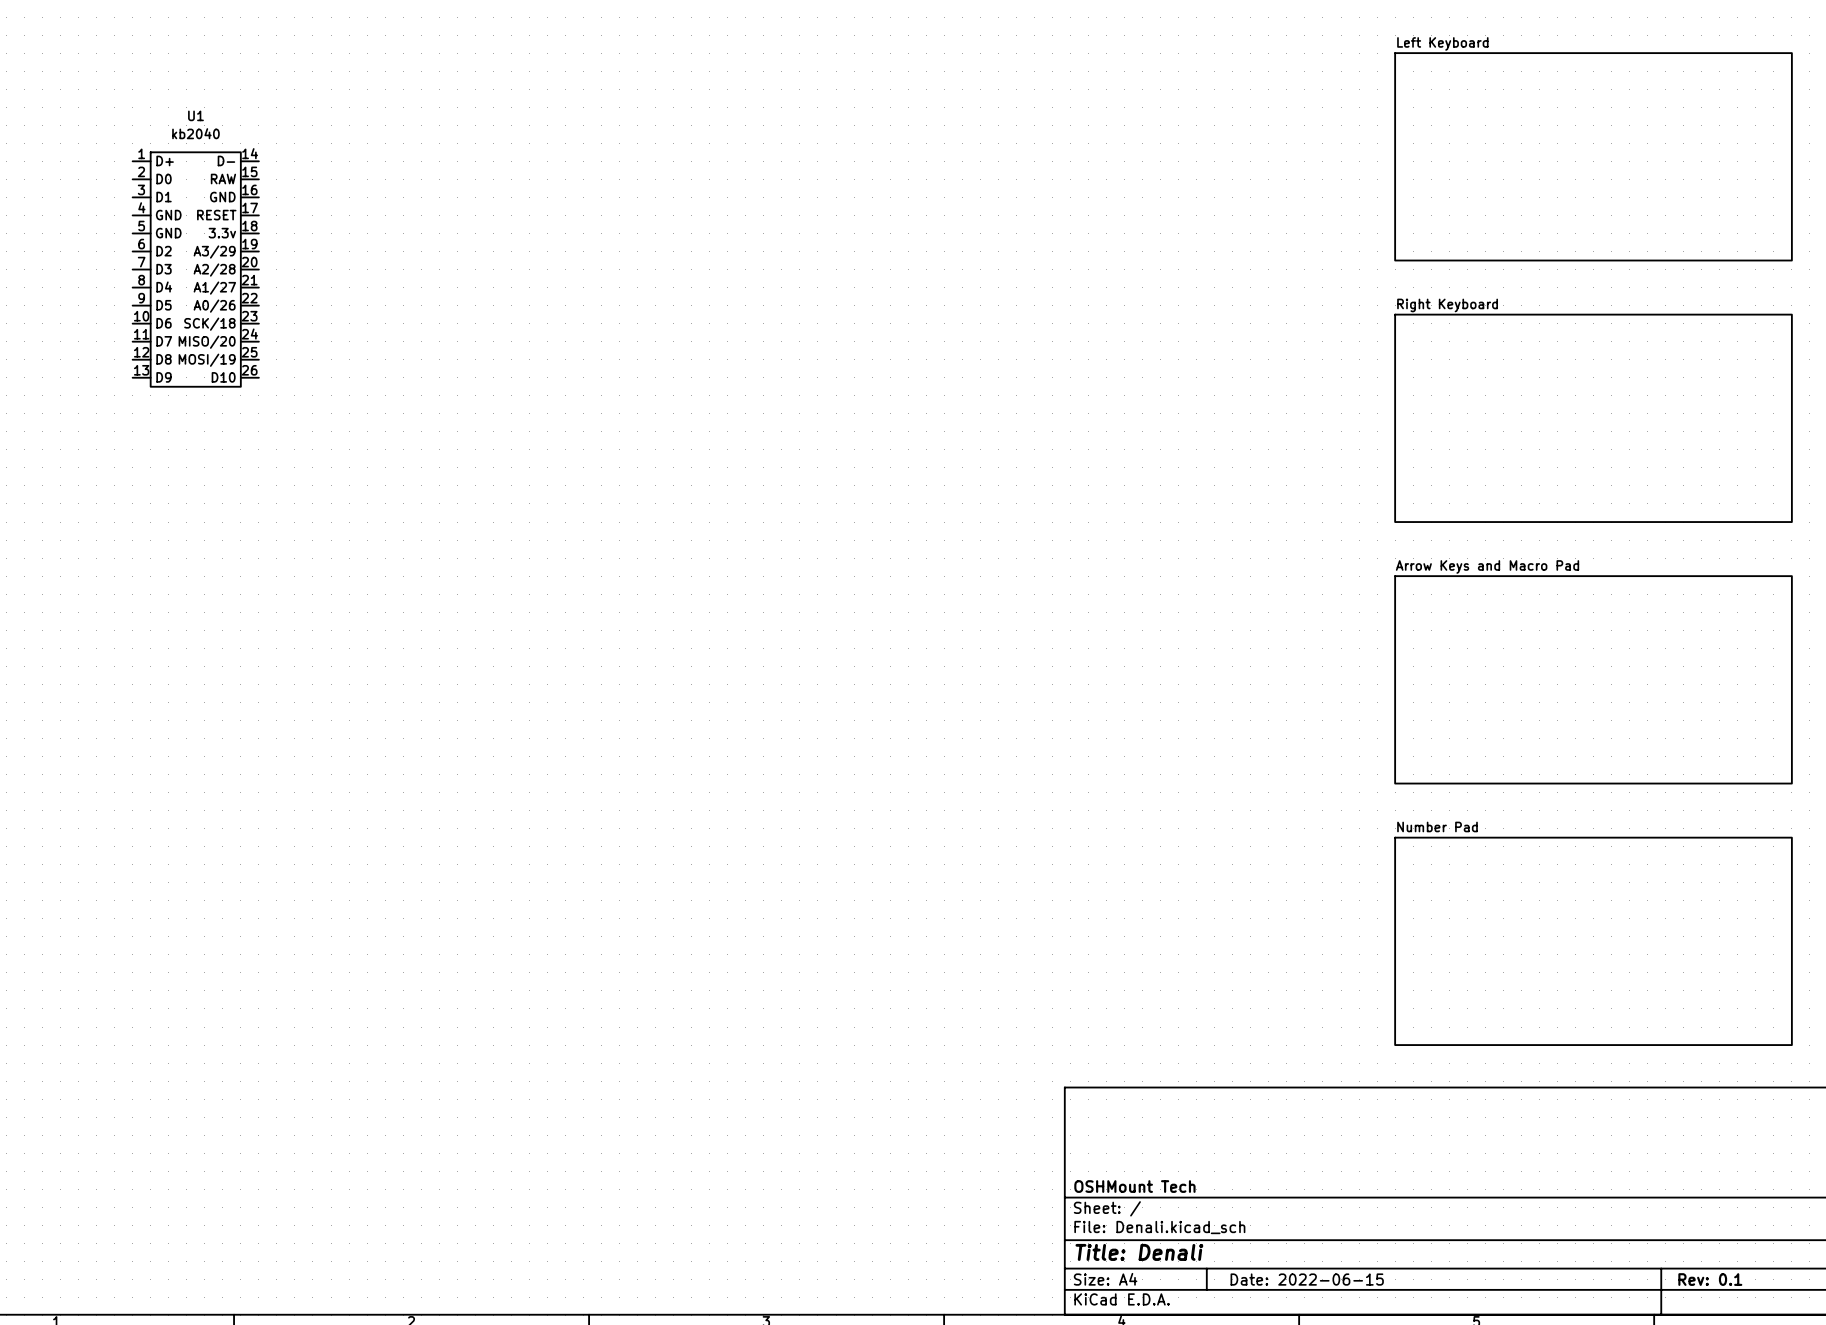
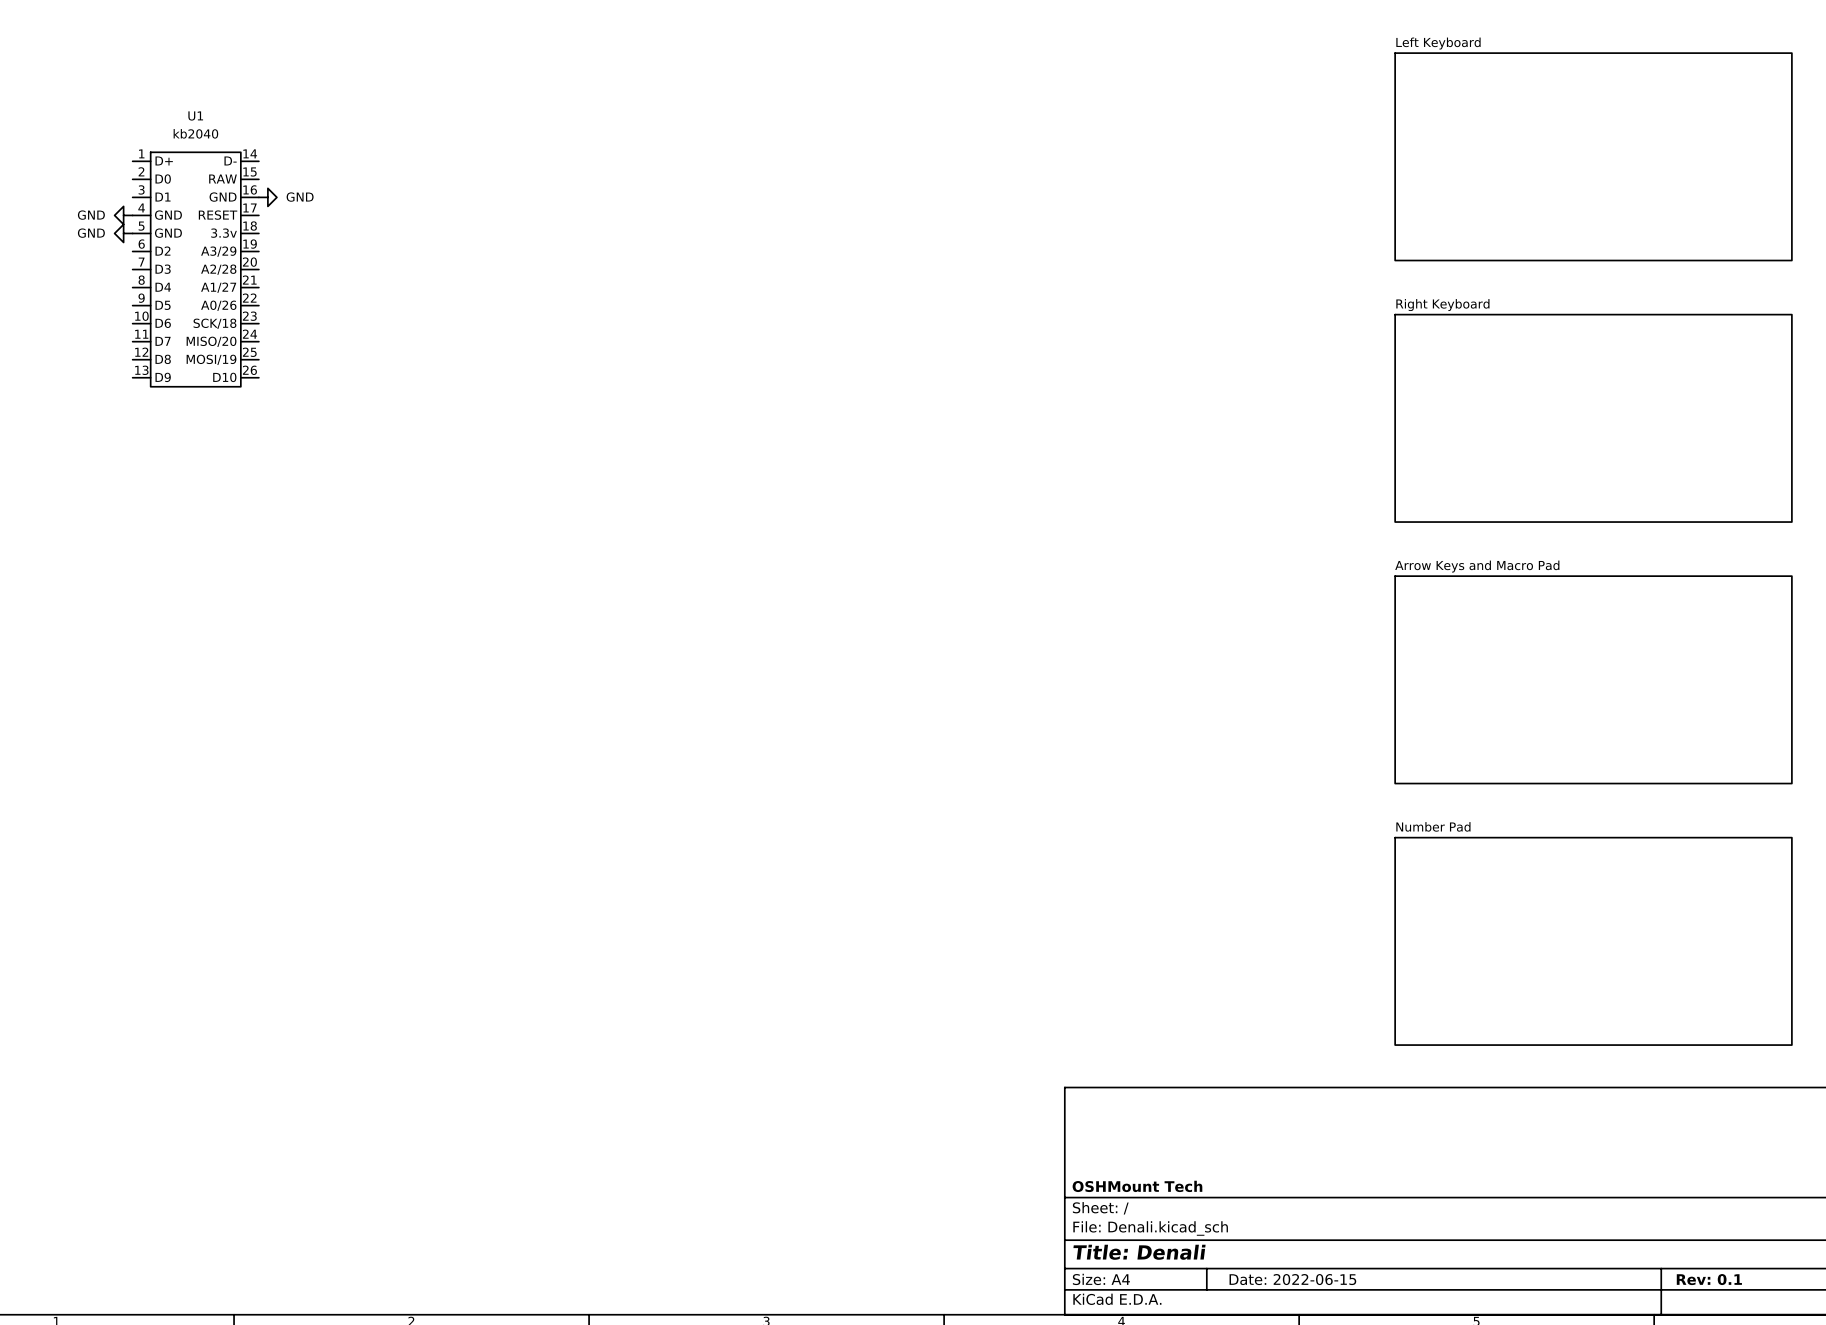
power symbol: none -> GND (267, 197)
power symbol: none -> GND (123, 215)
power symbol: none -> GND (123, 233)

